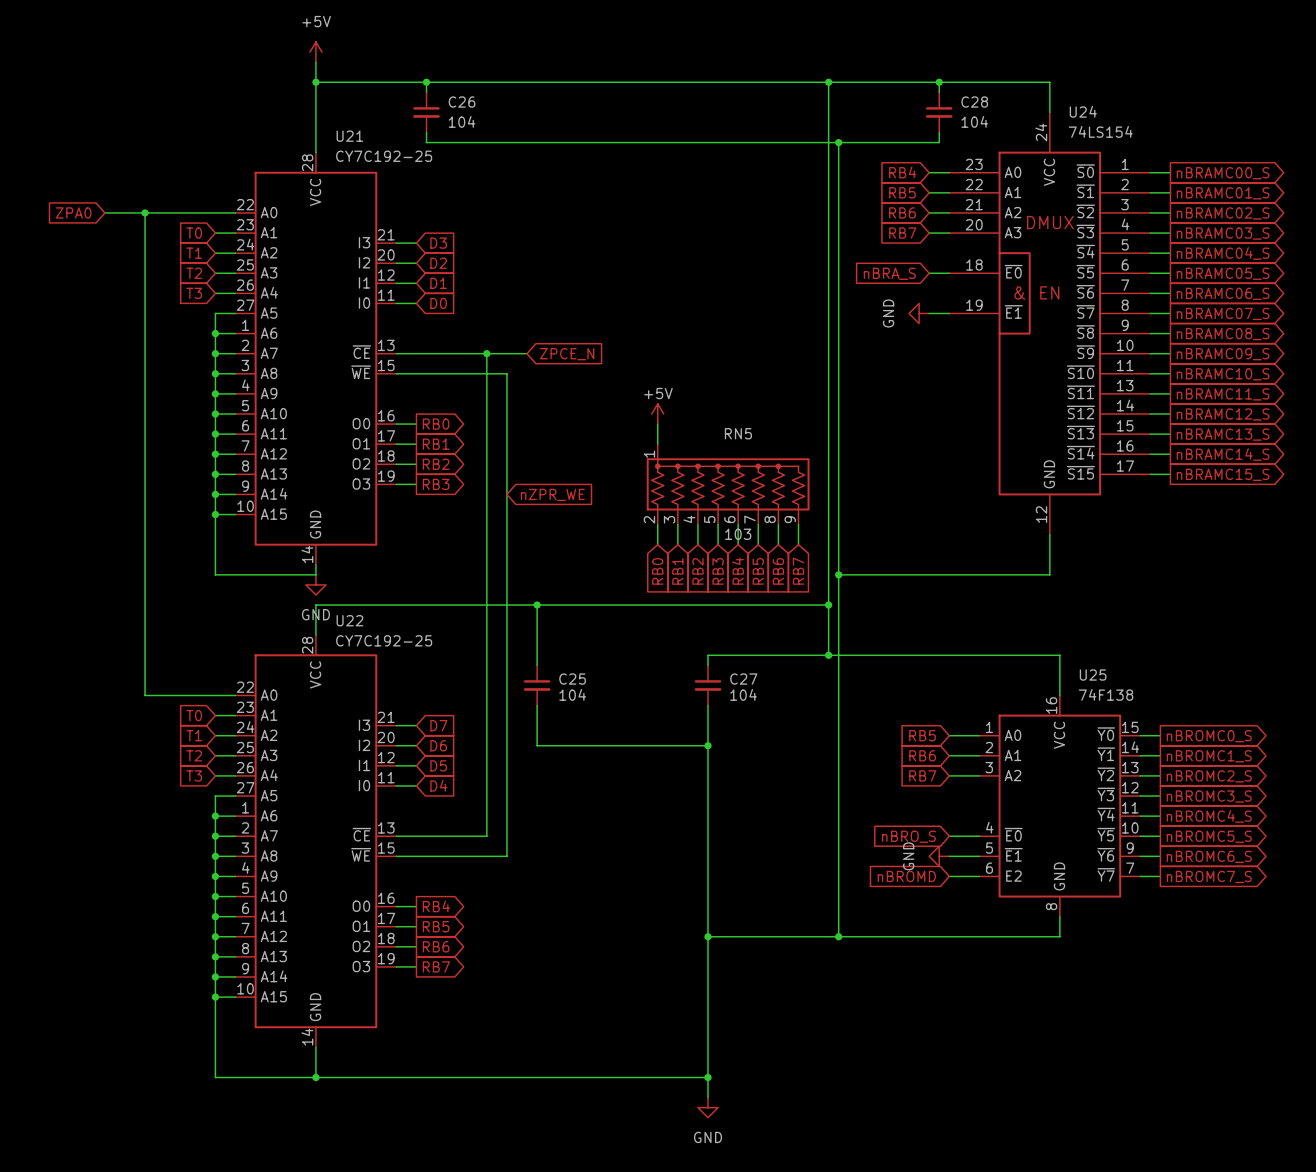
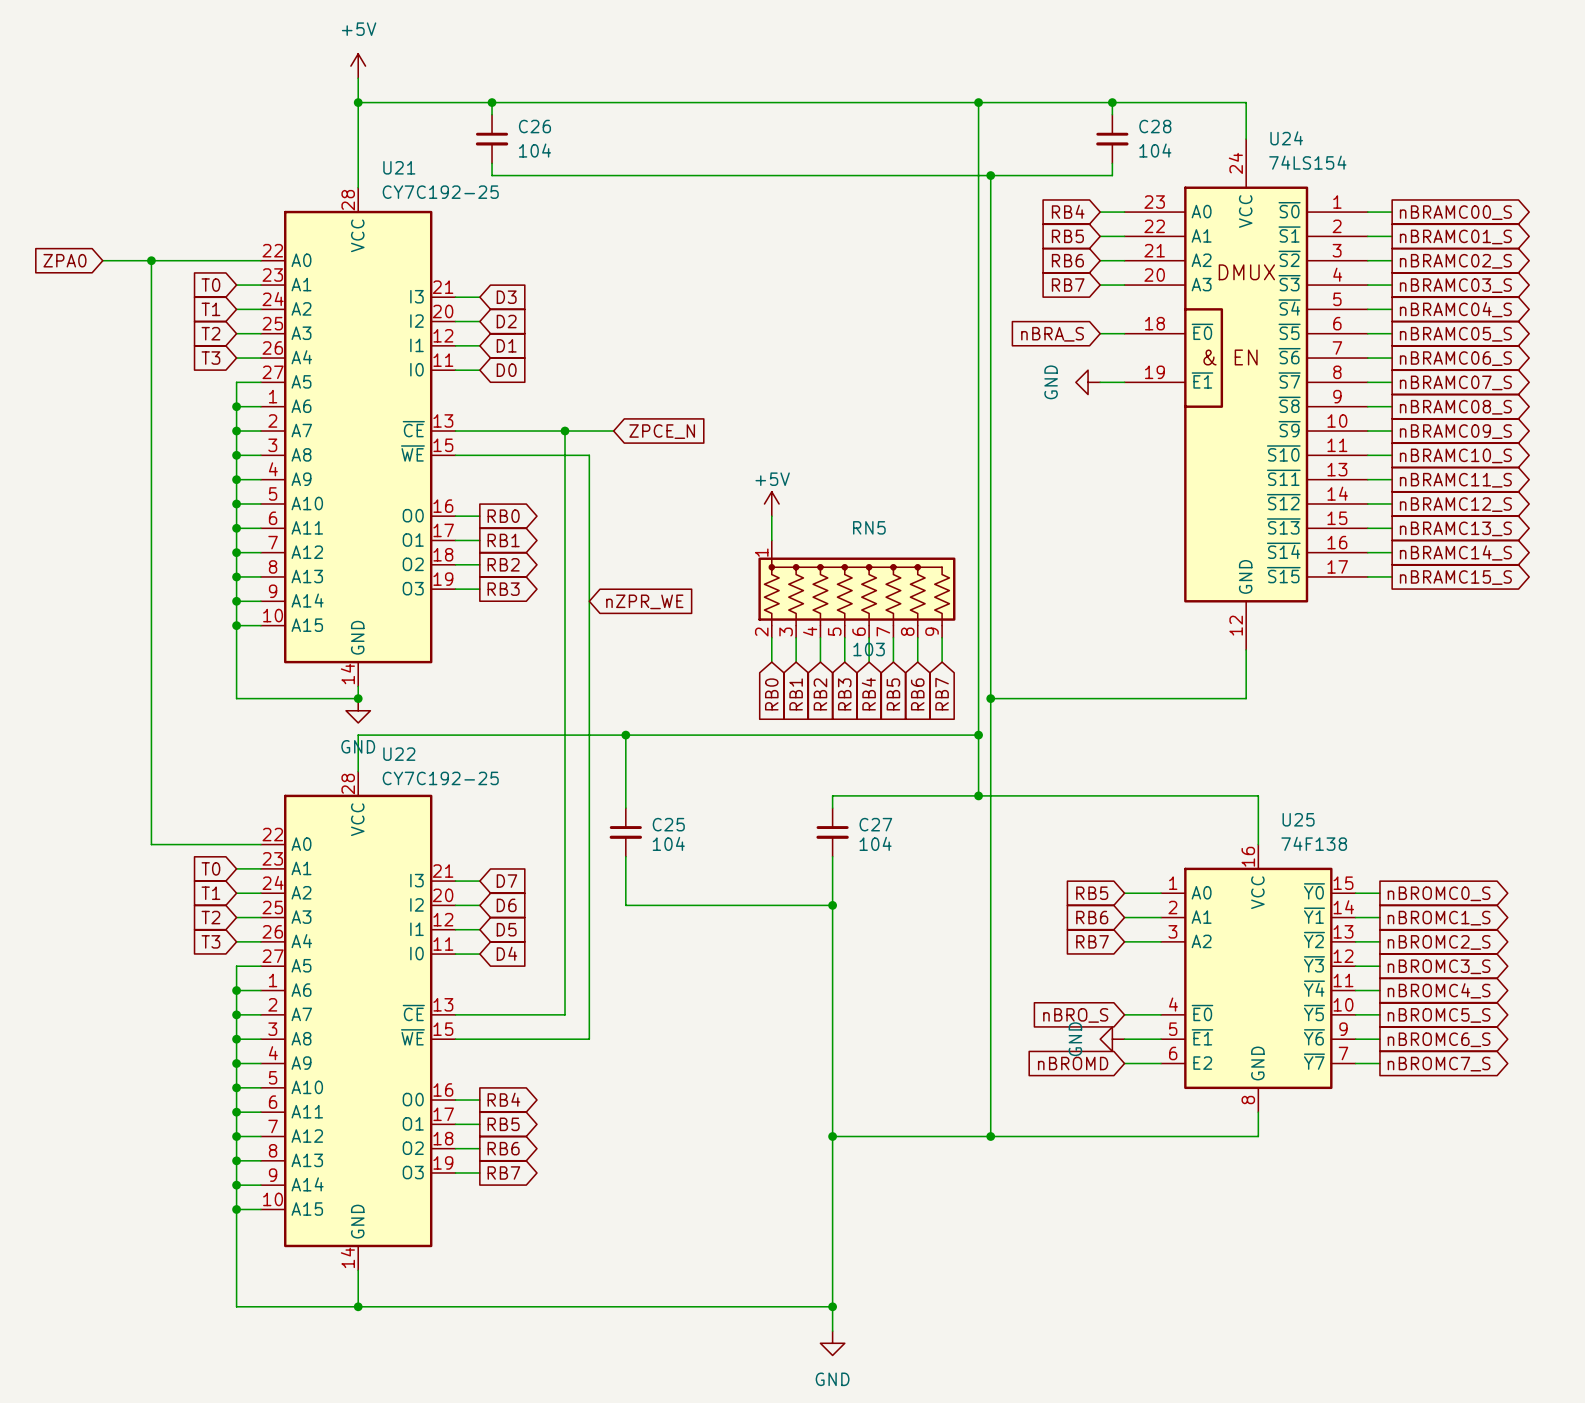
junction: none -> (358, 698)

